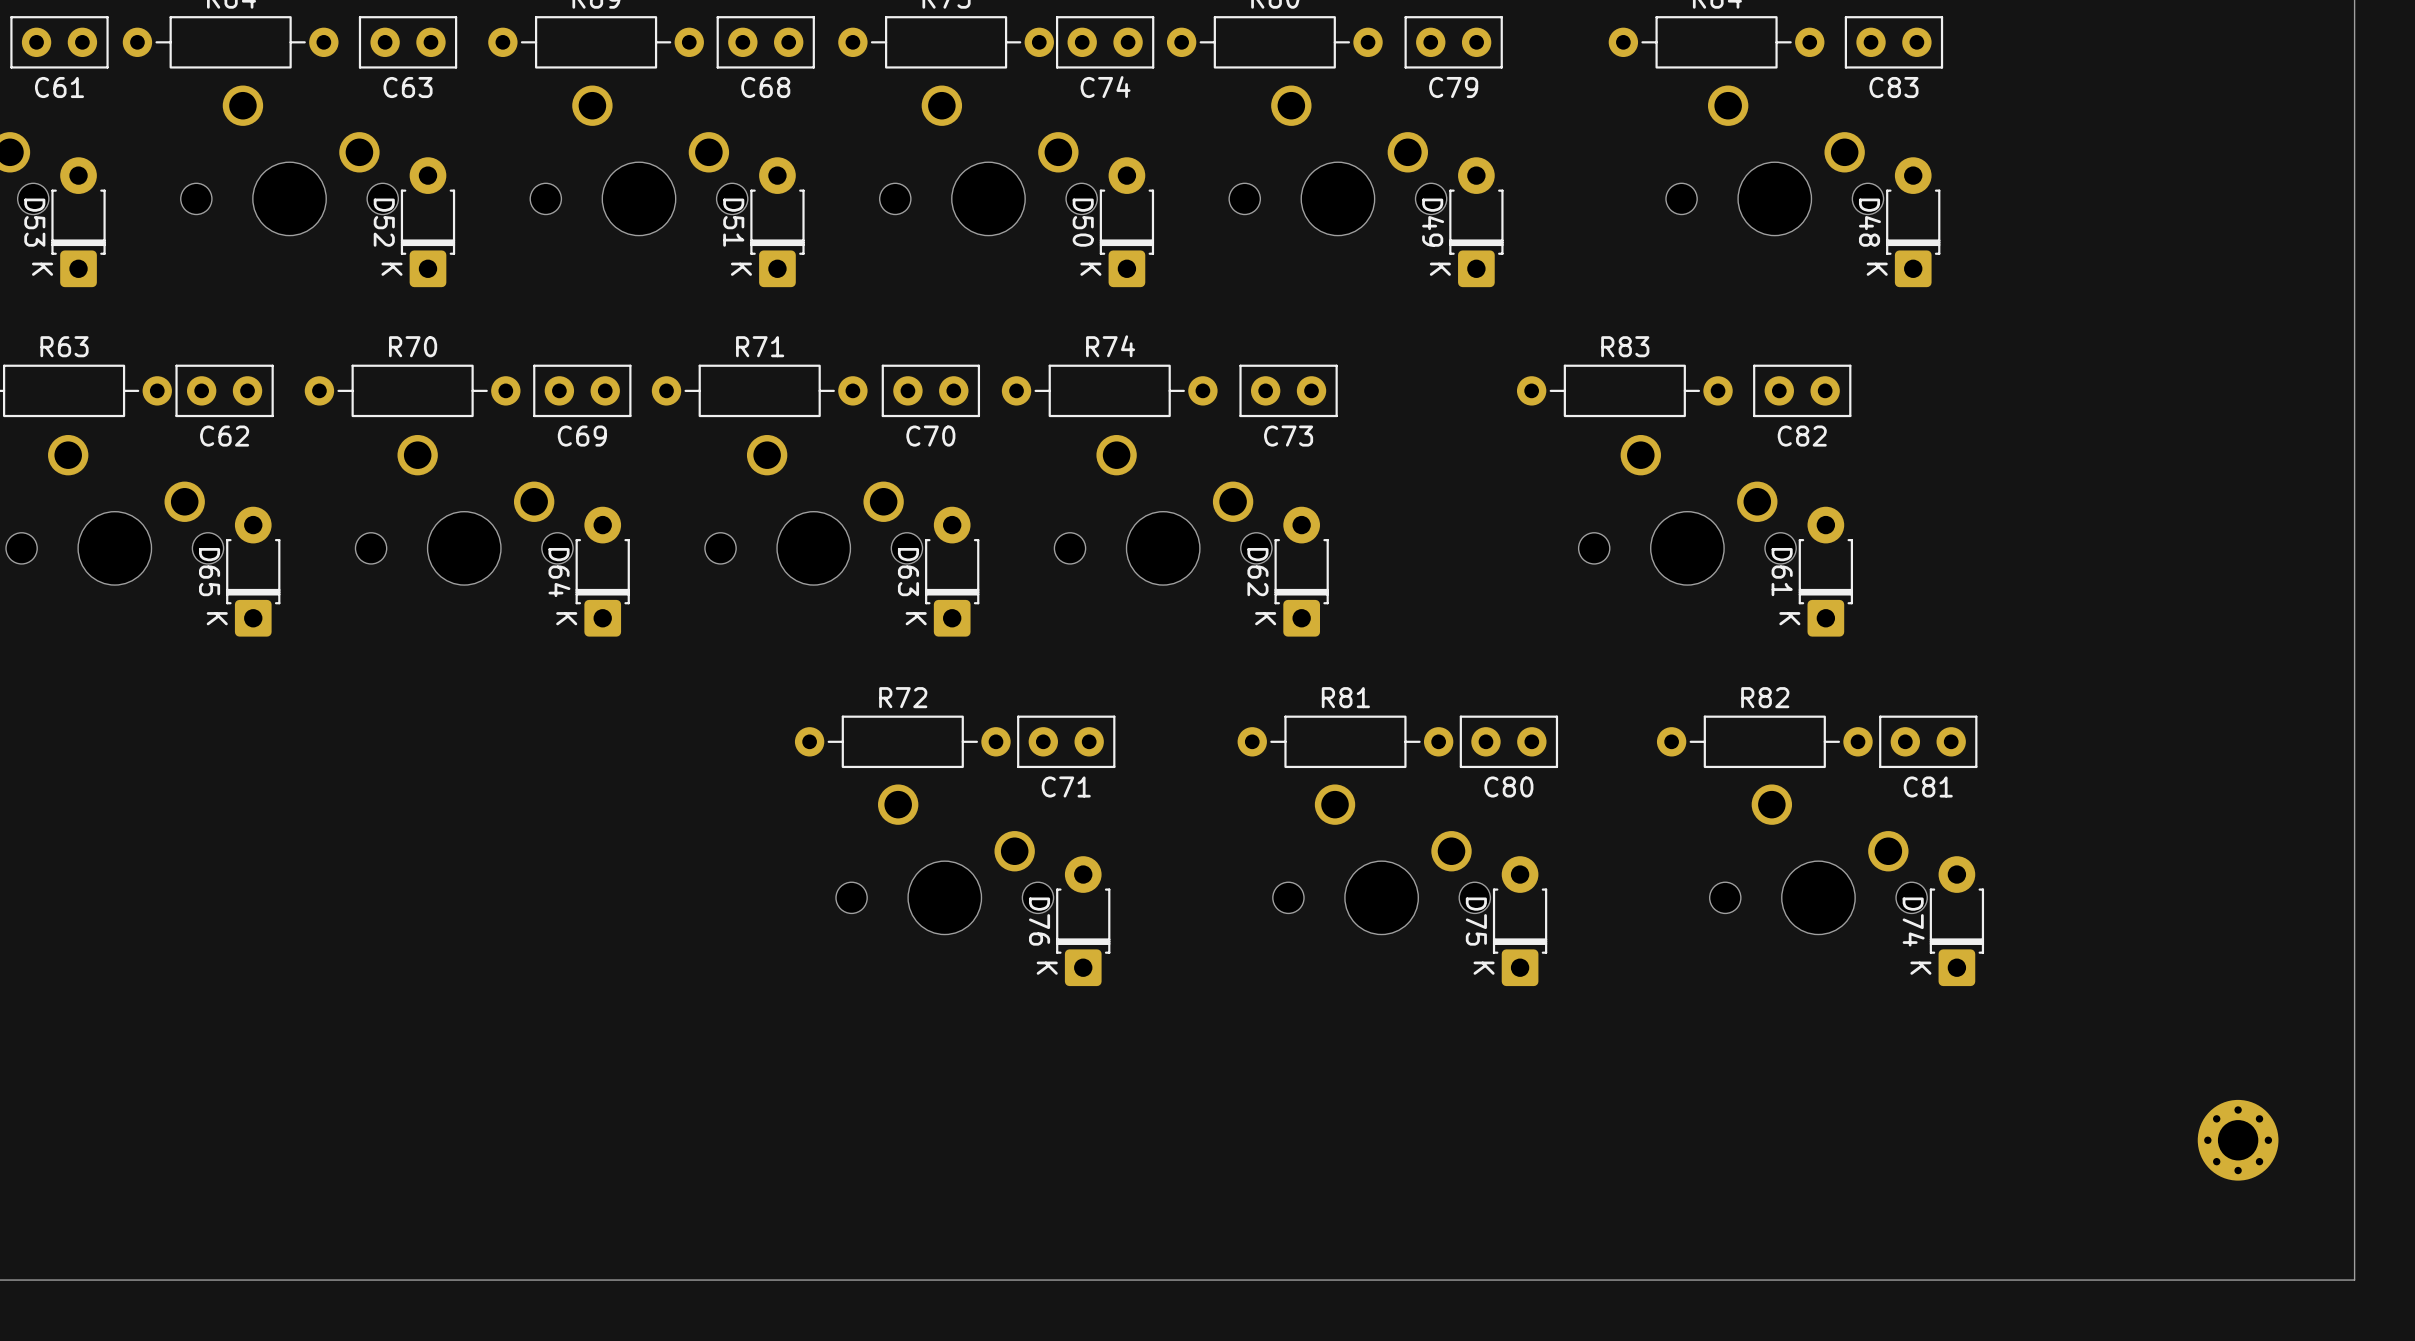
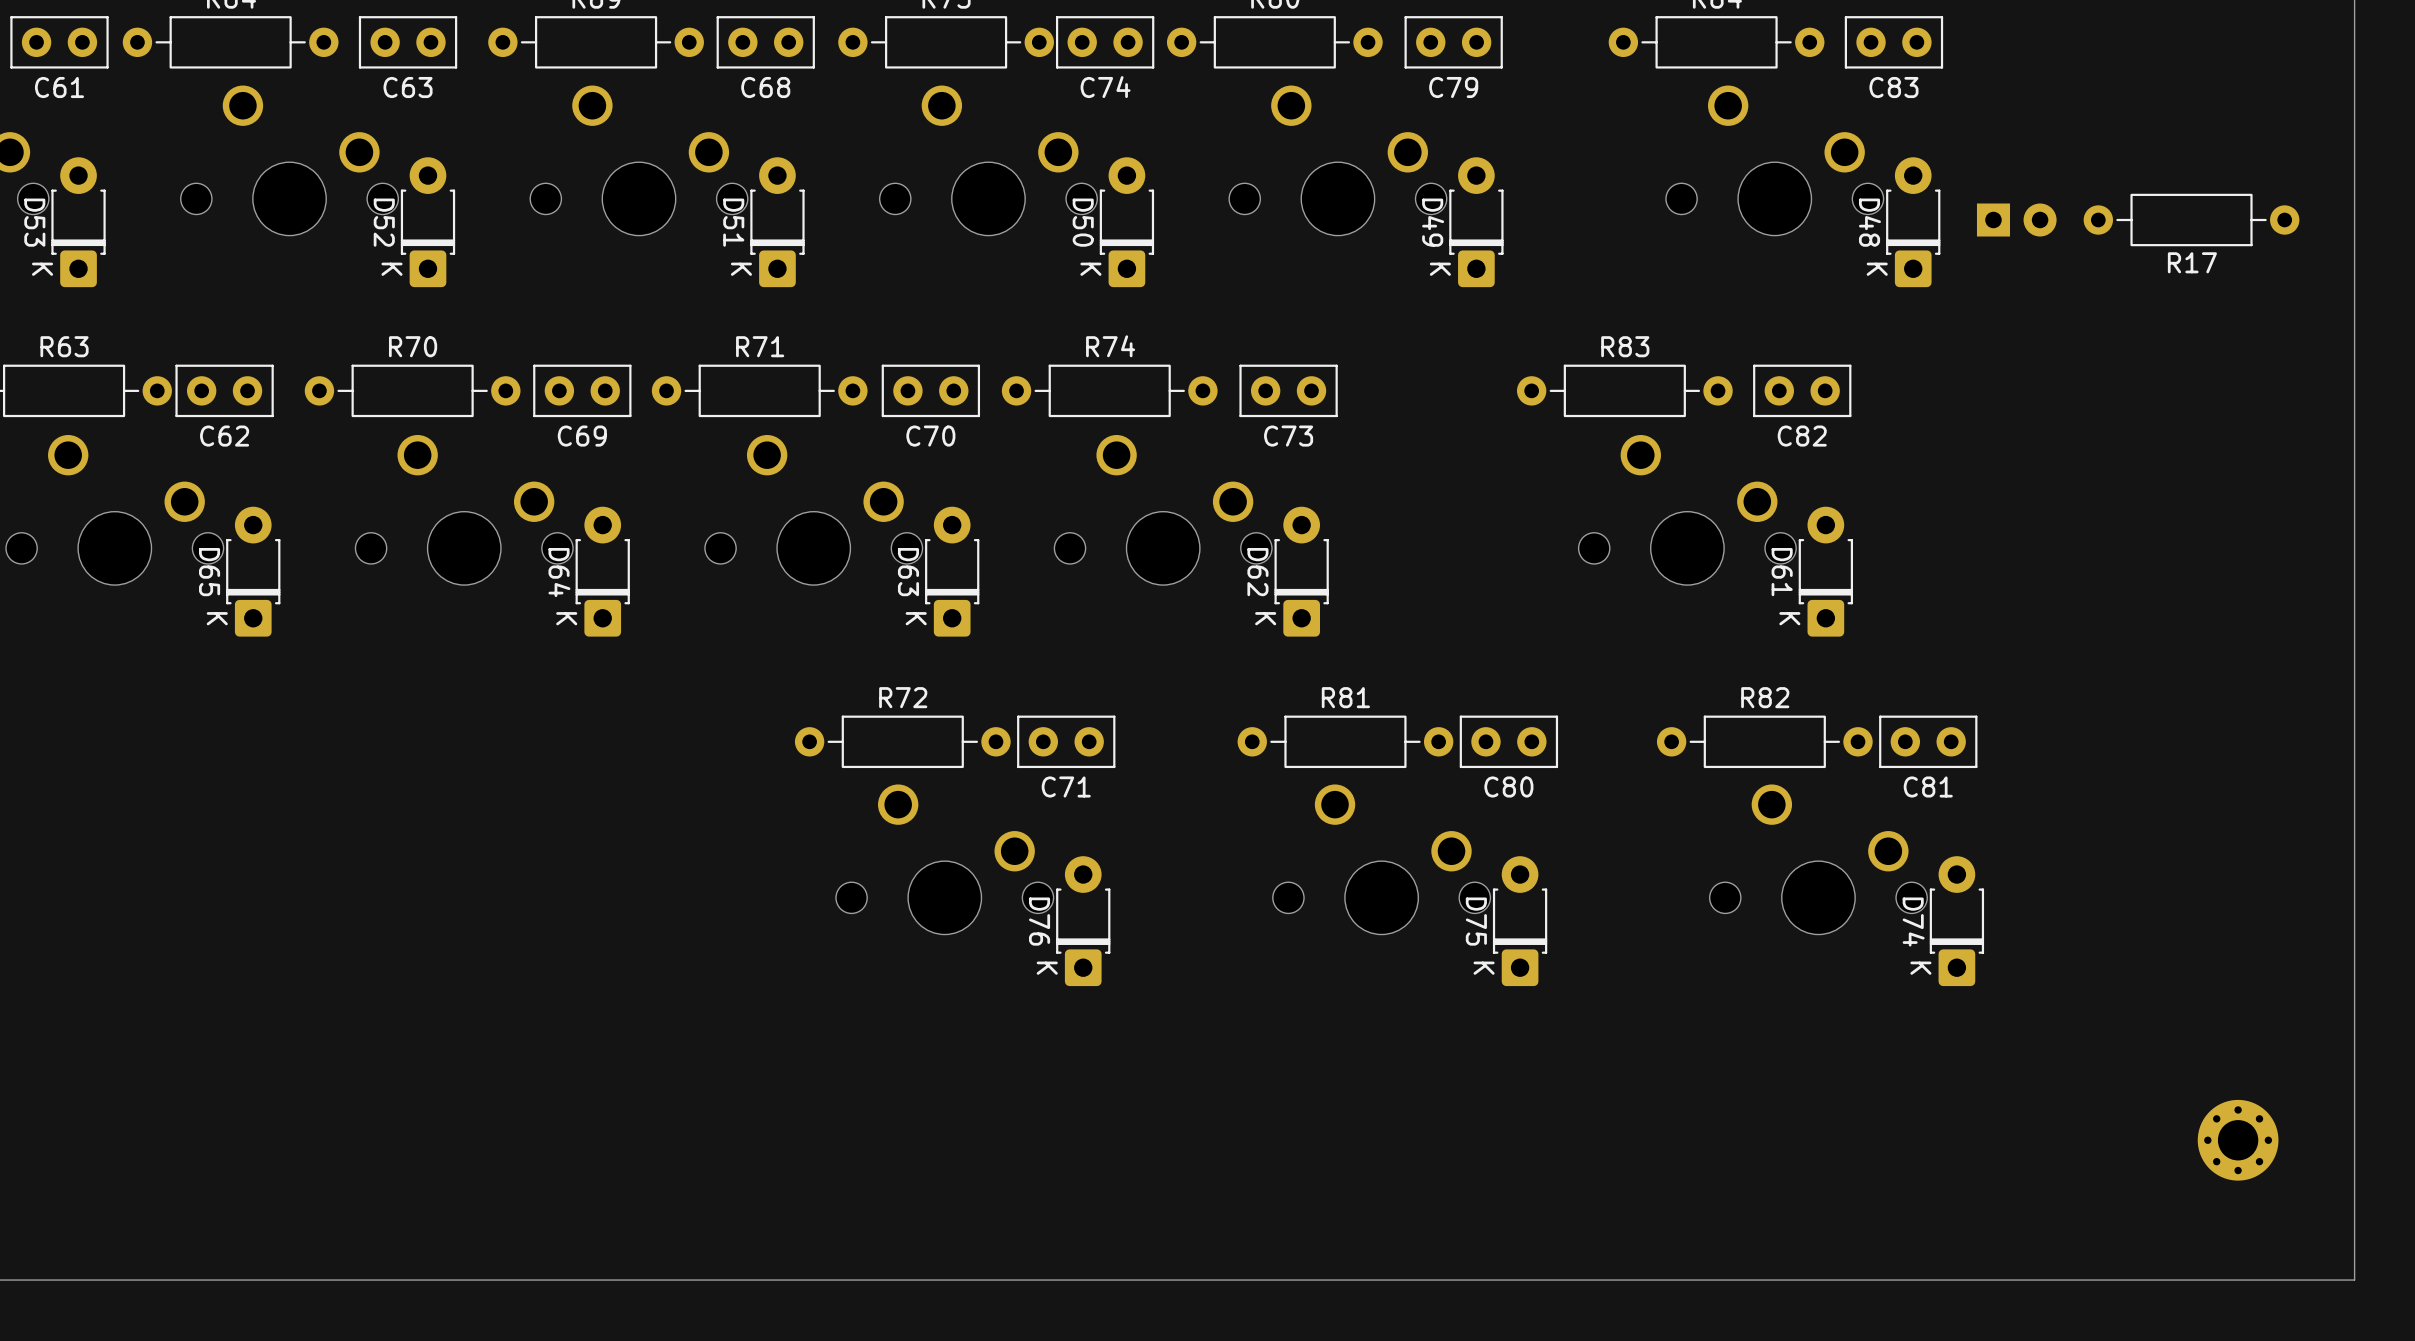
part: none -> (2016, 220)
R17: none -> (2191, 220)

